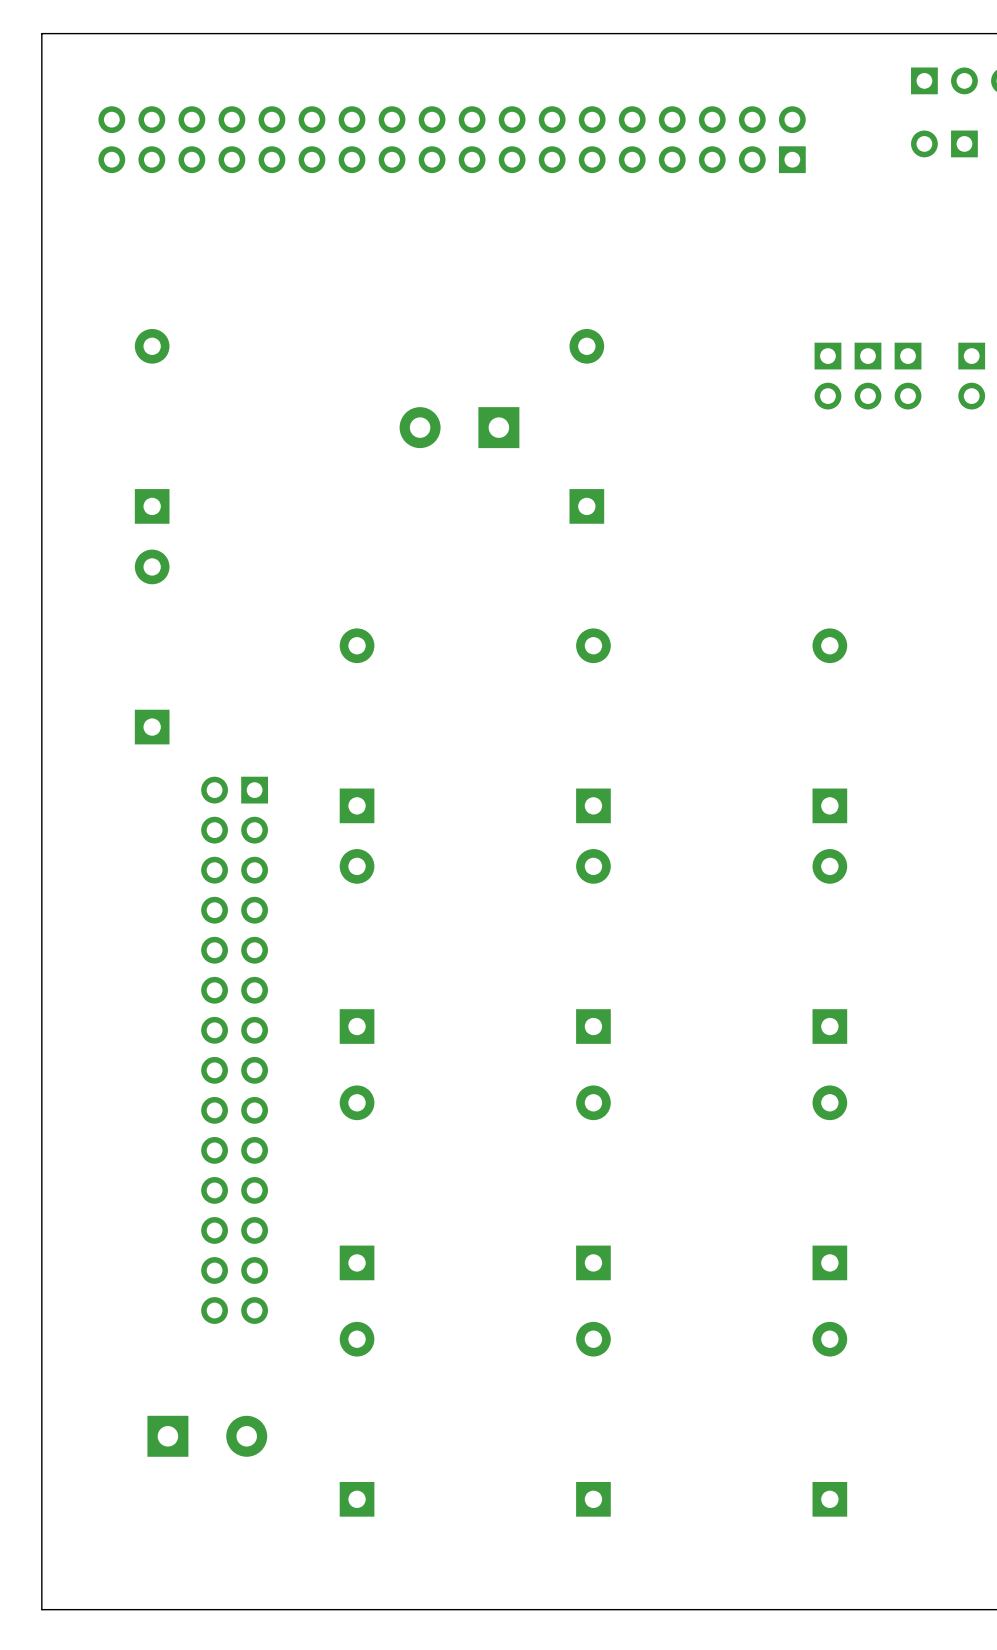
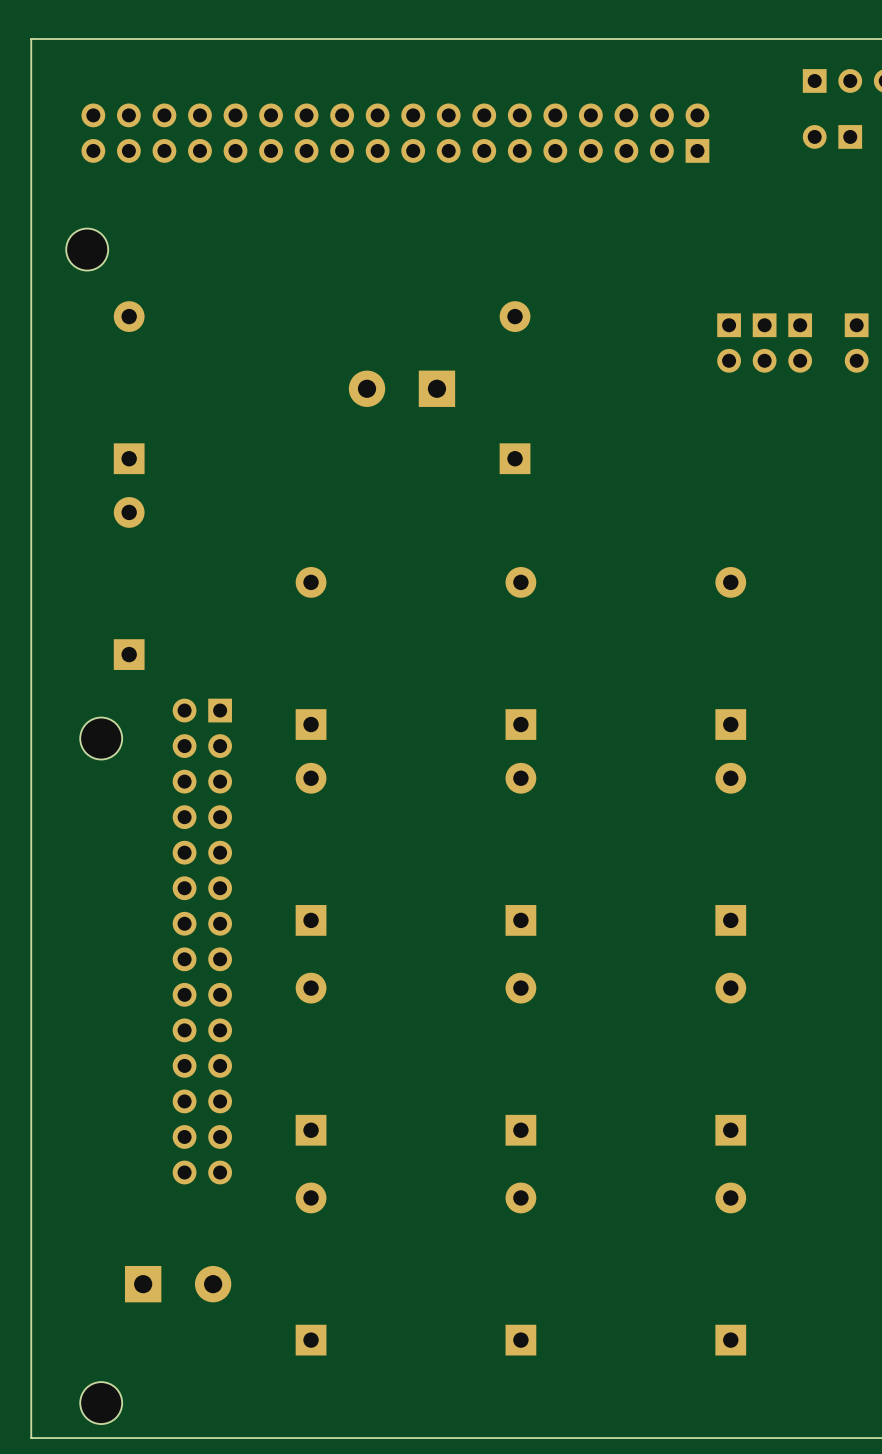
part: none -> (87, 249)
part: none -> (101, 738)
part: none -> (101, 1403)

